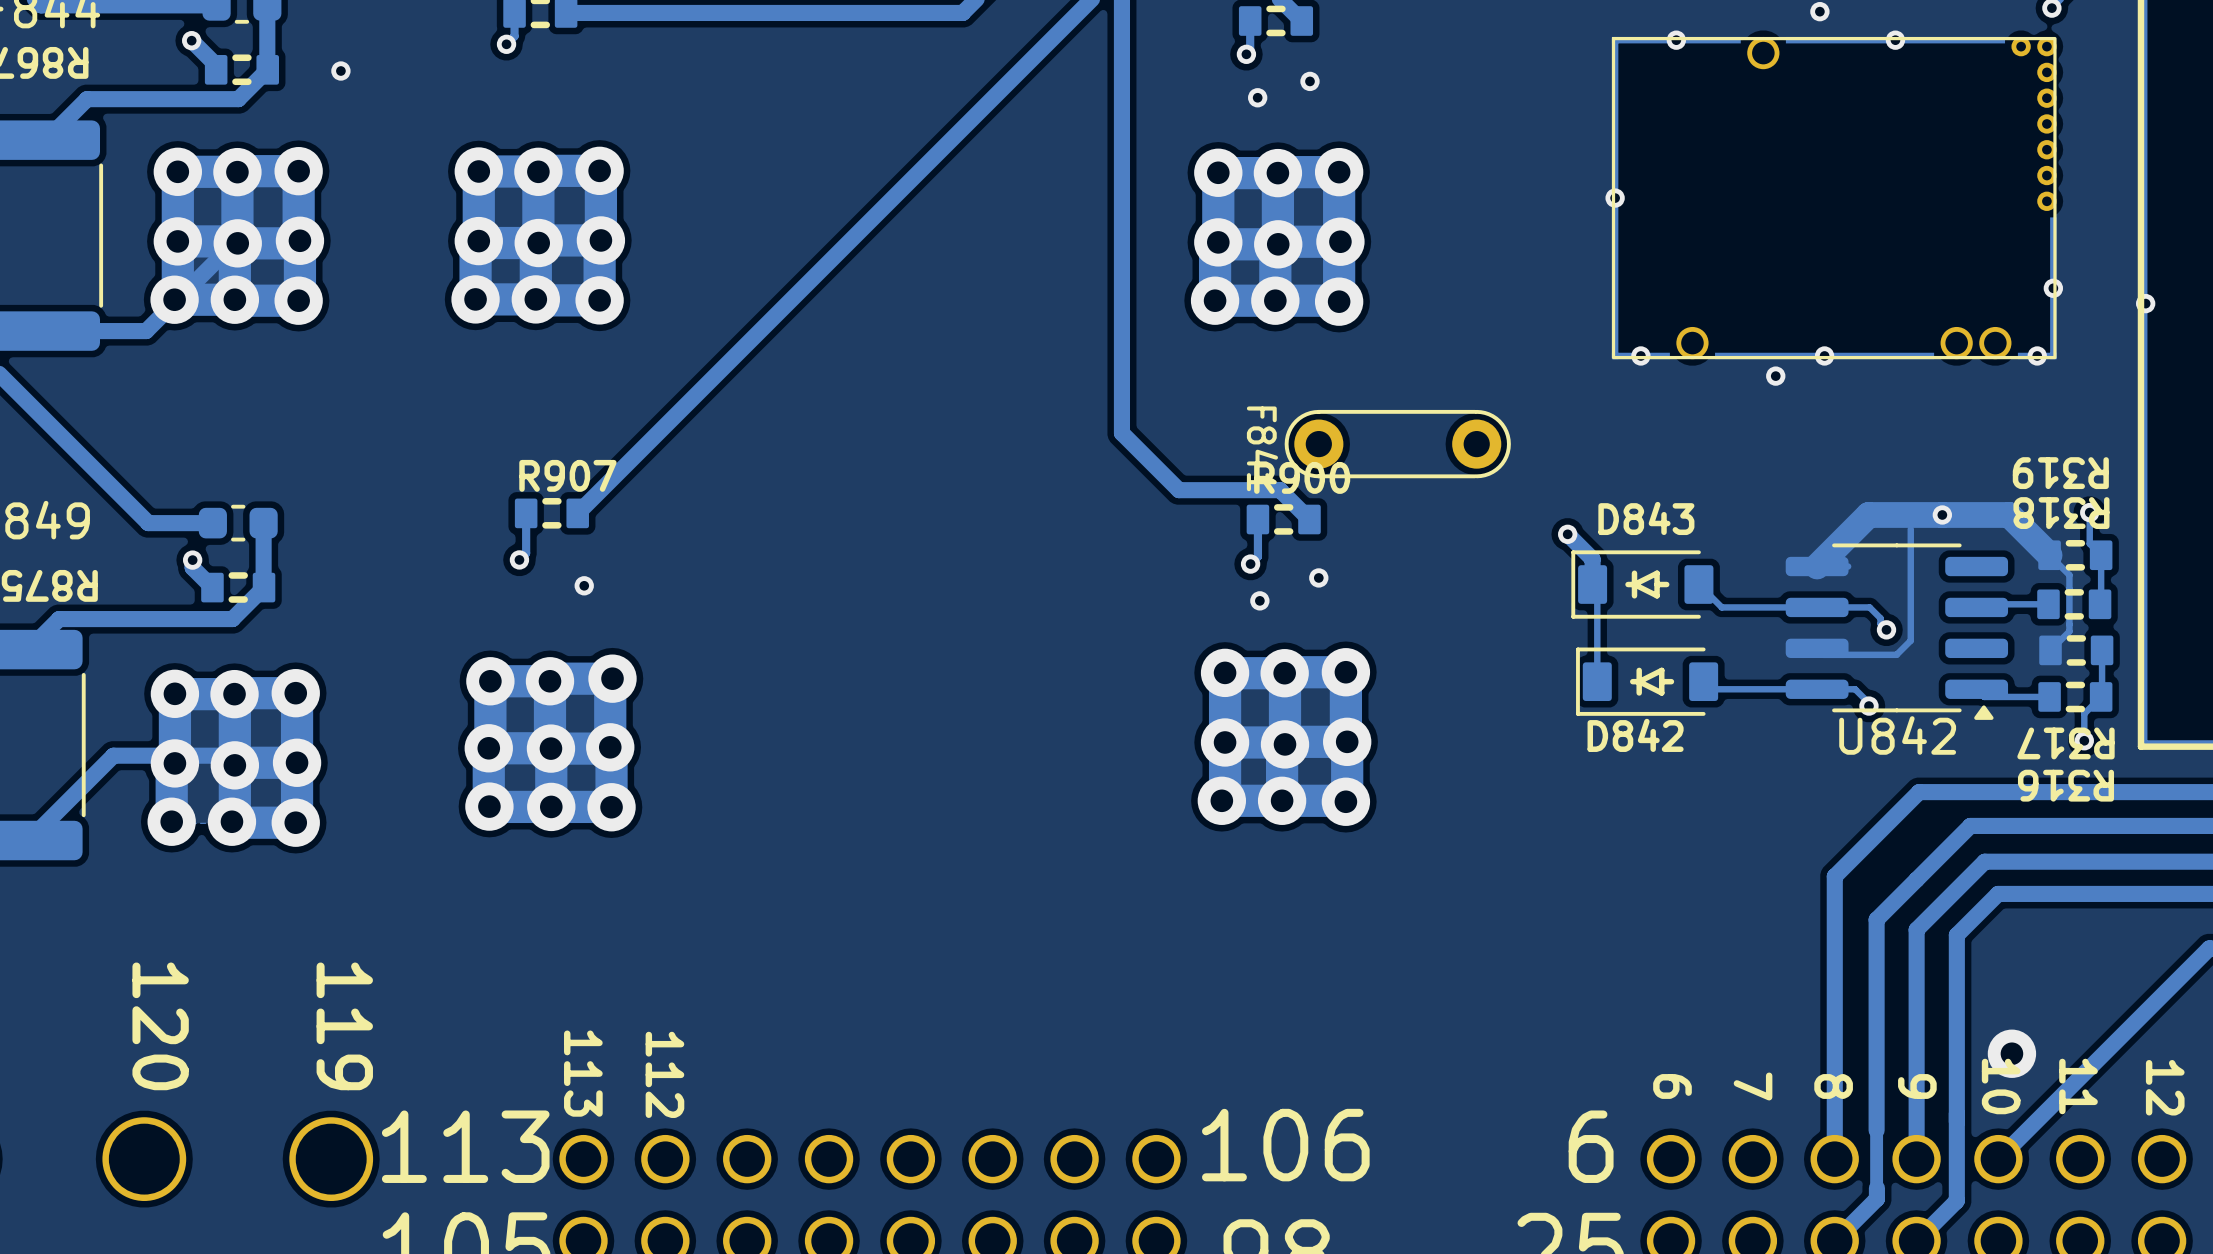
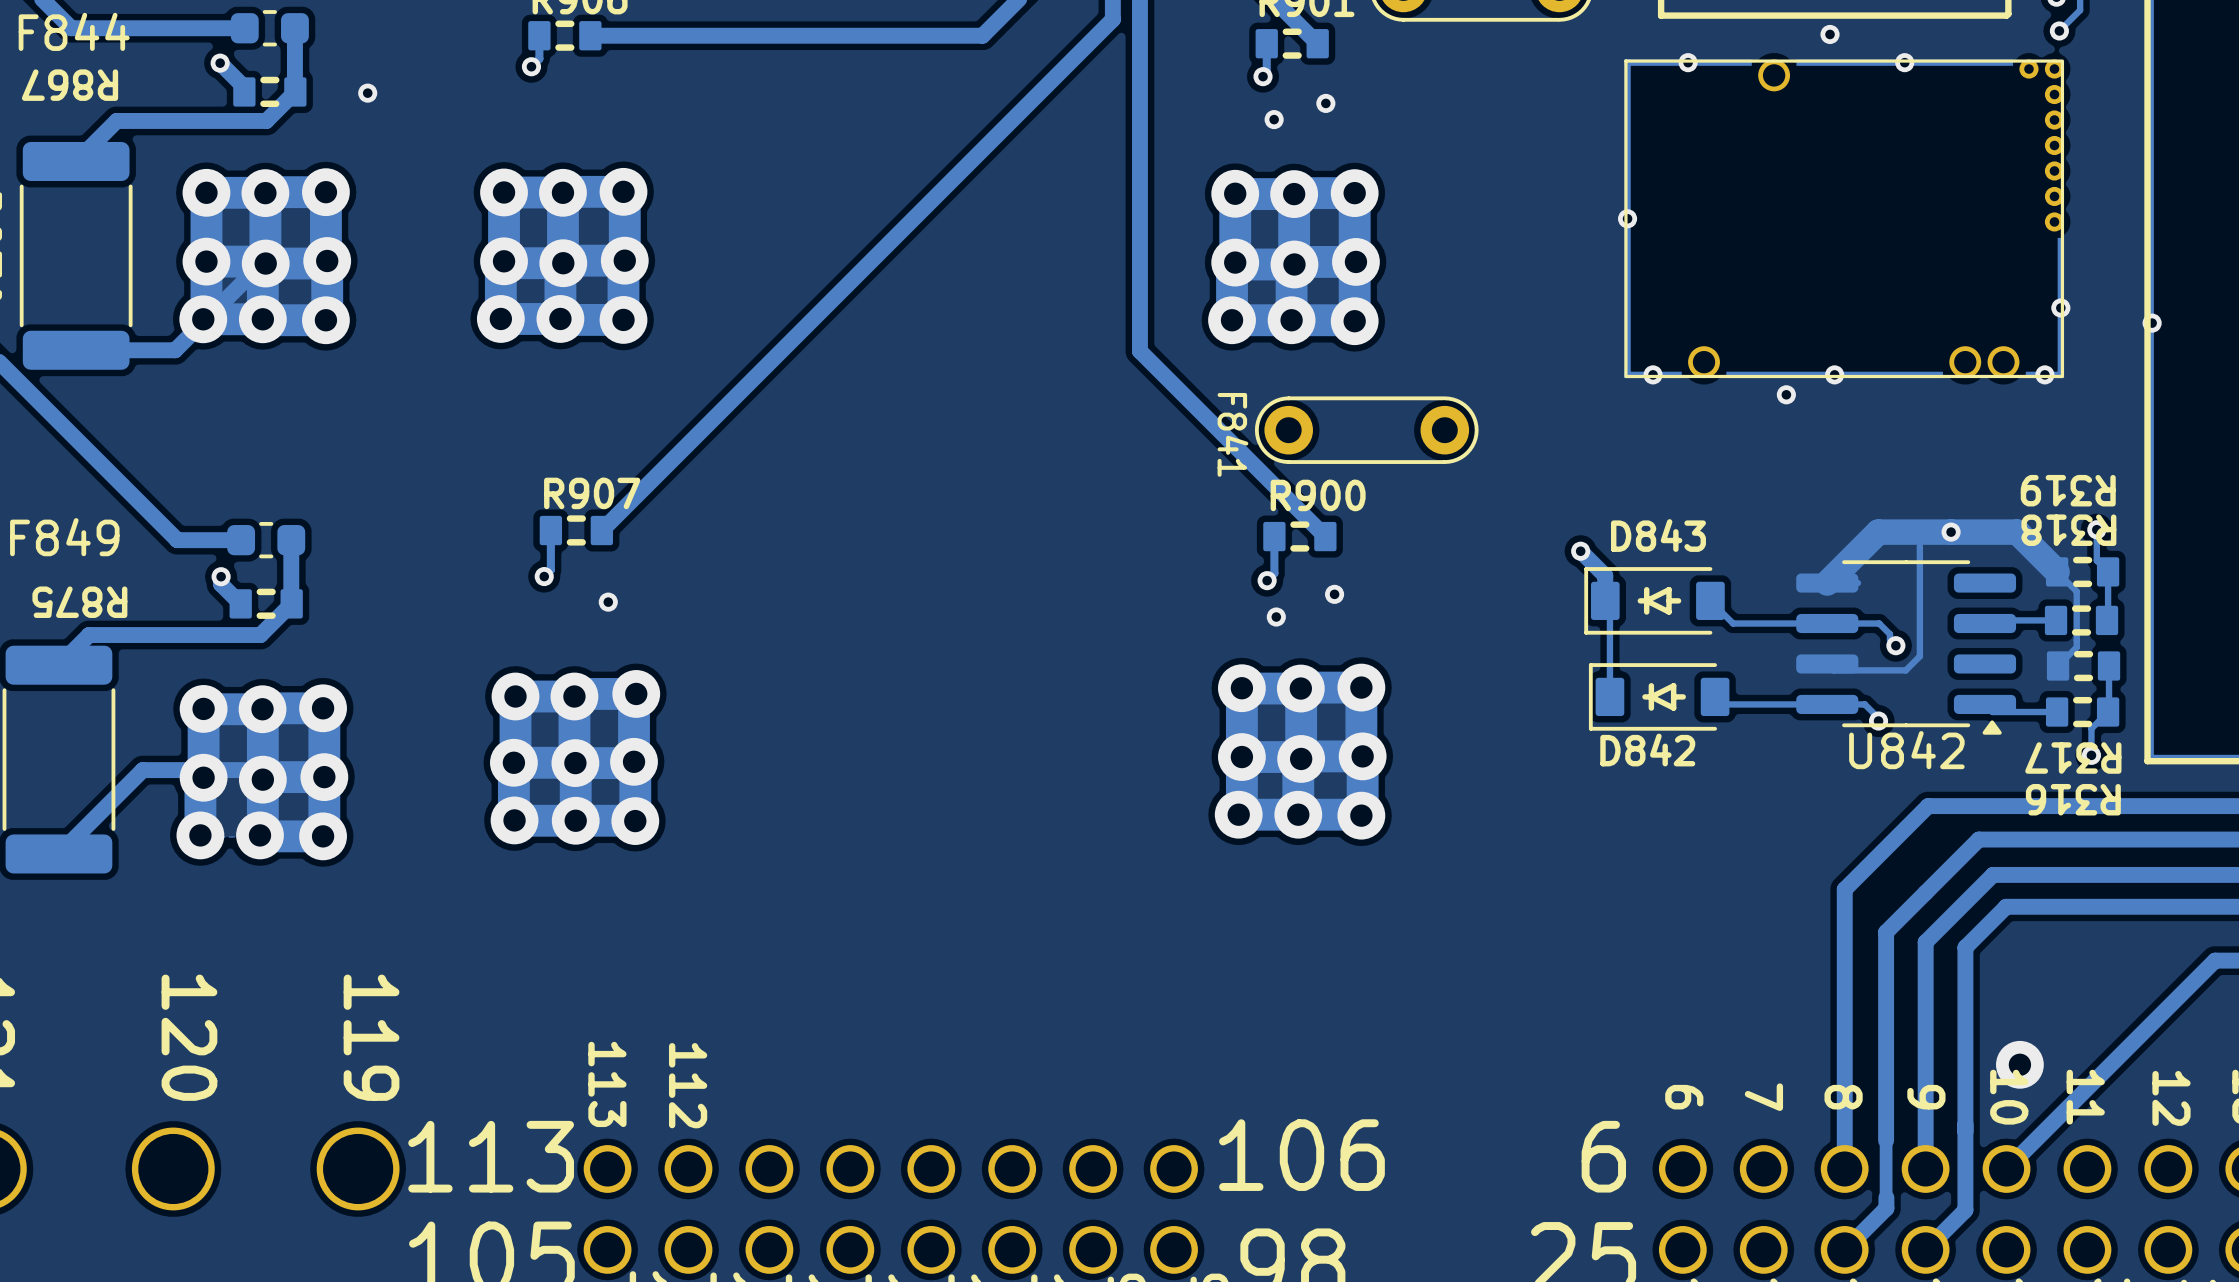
track: (1121, 331) (1121, 433) (1178, 490) (1280, 490) -> (1139, 351) (1296, 507)
F841 position: (1397, 444) -> (1366, 430)

